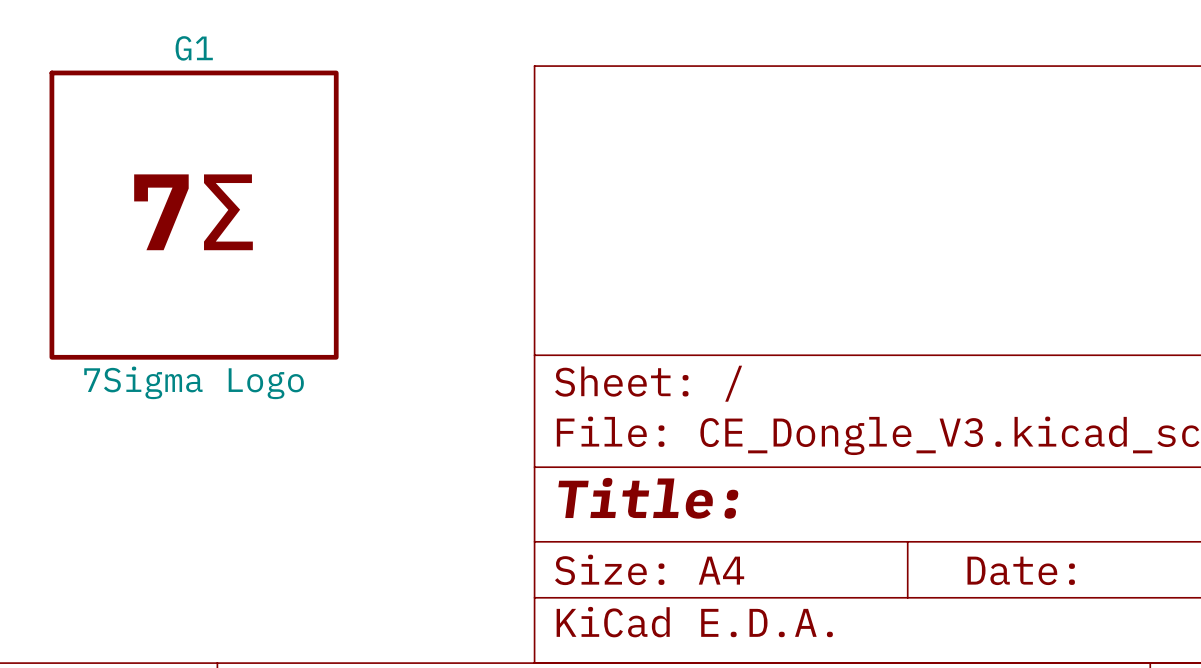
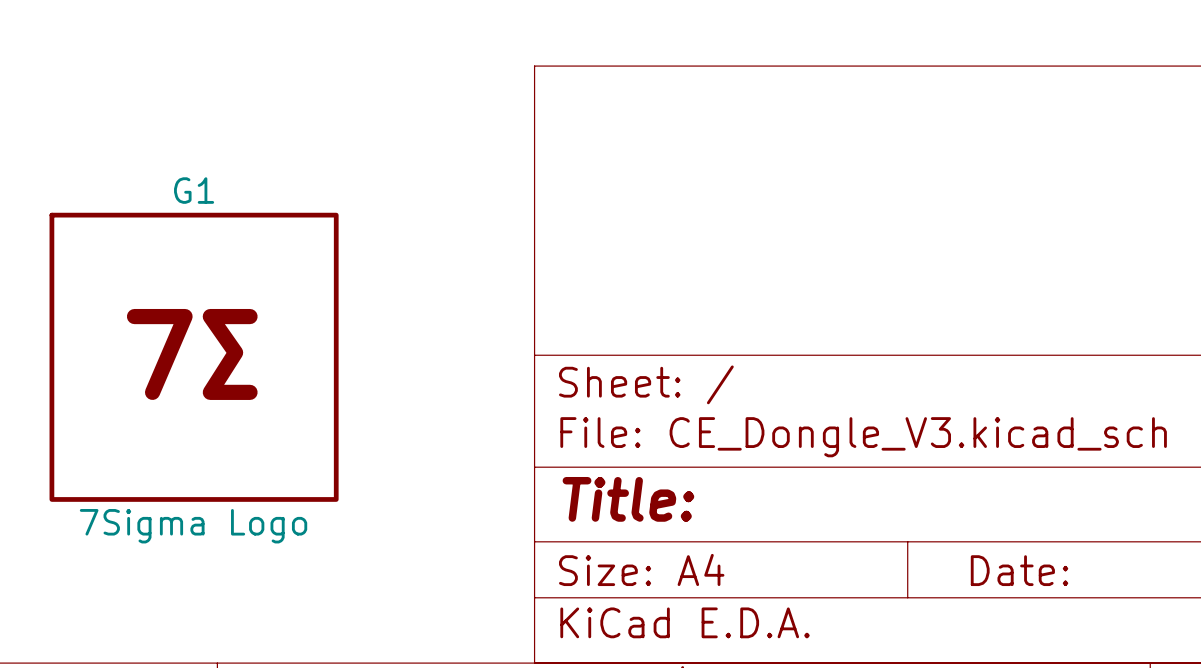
G1 position: (194, 215) -> (194, 357)

